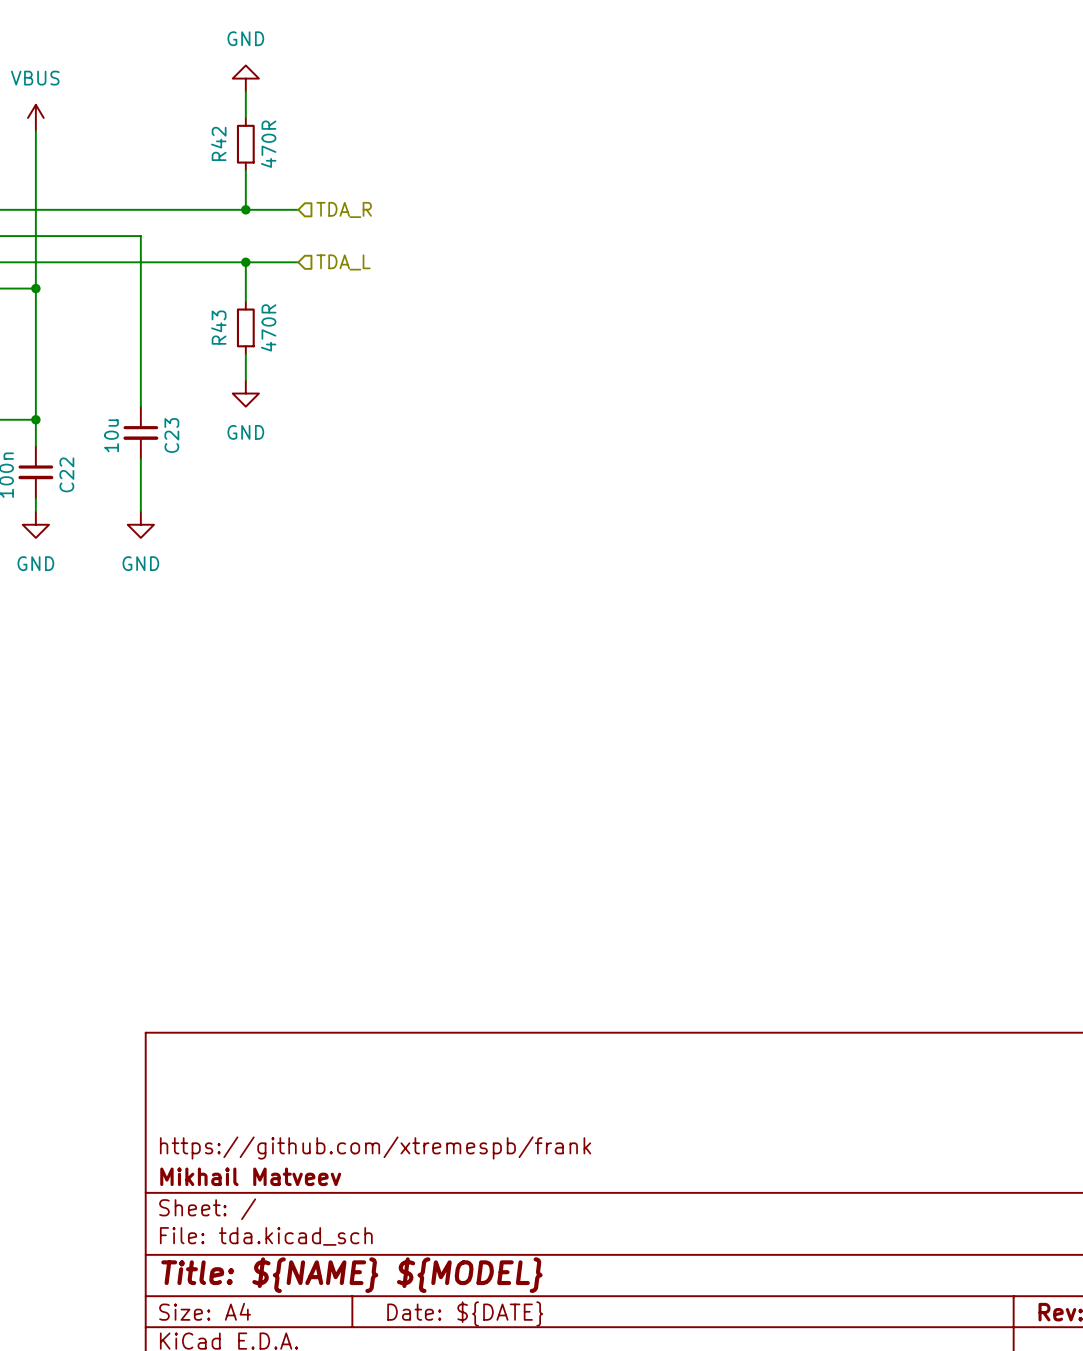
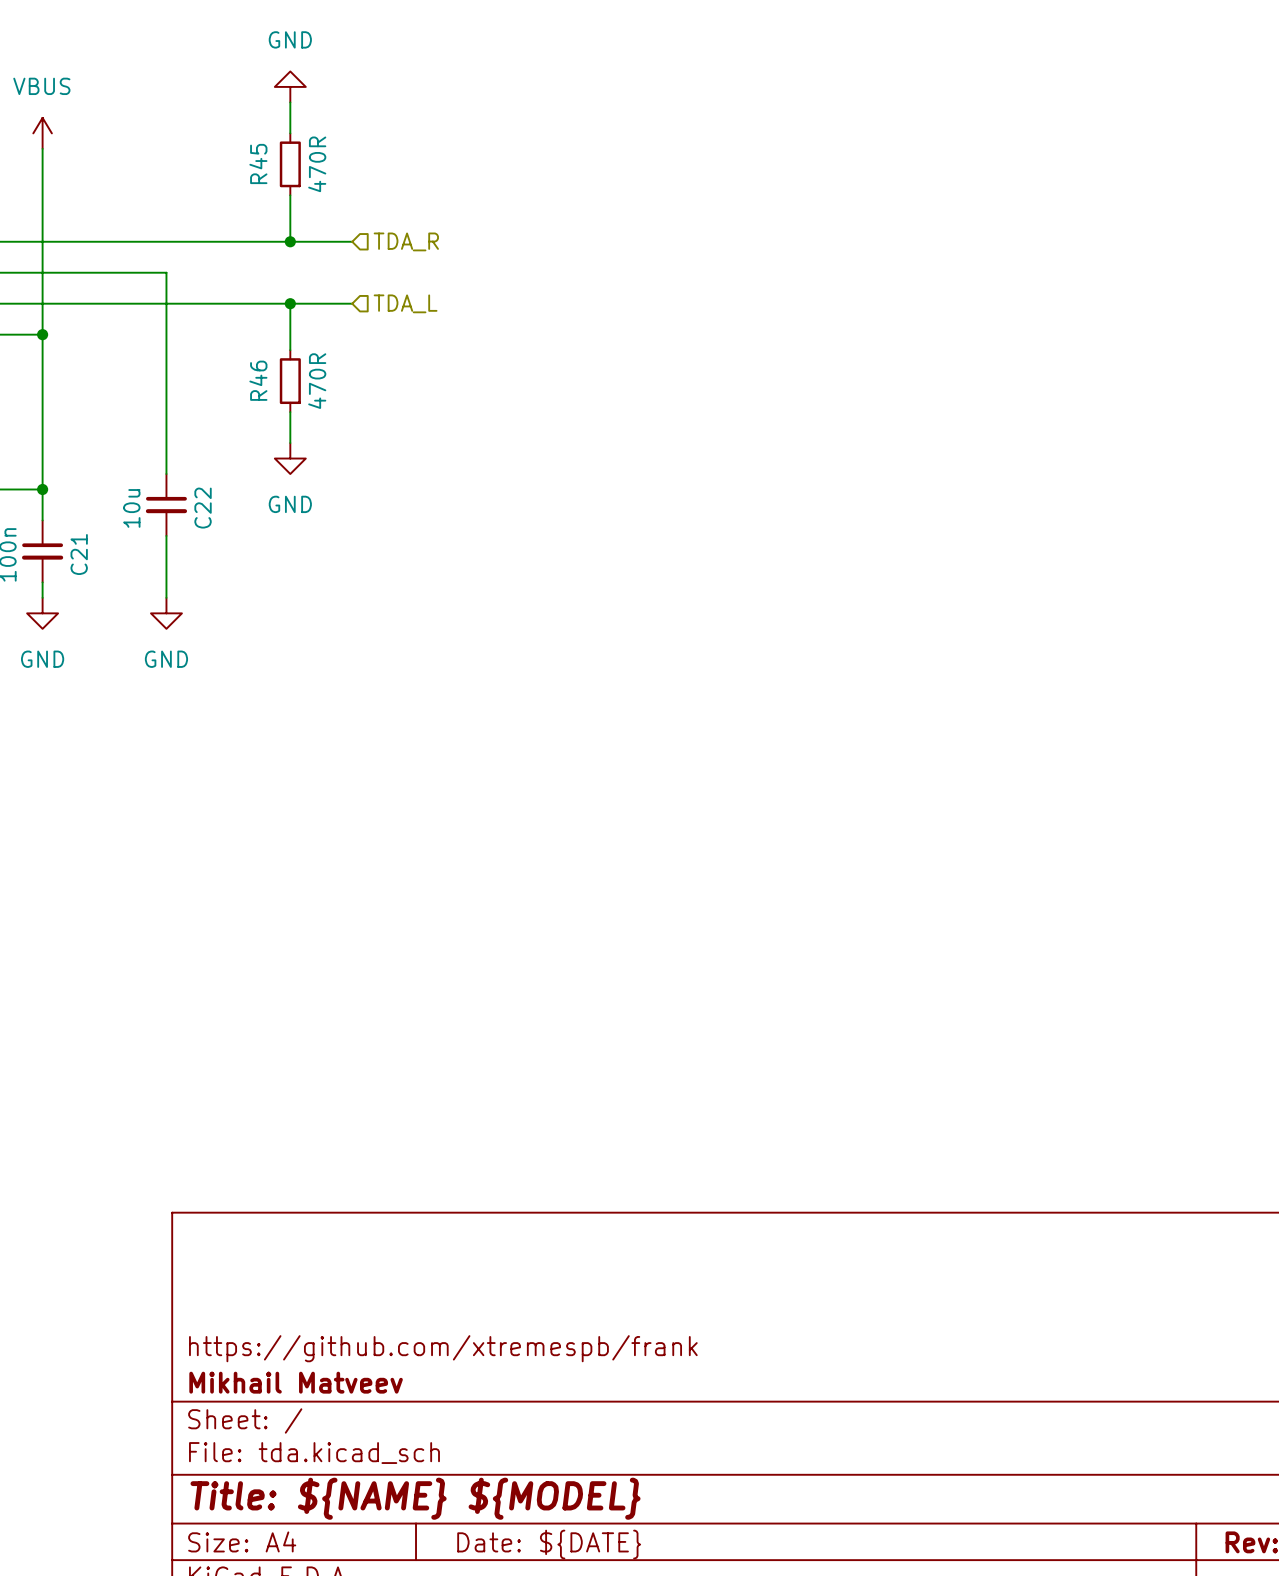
R42 name: R42 (218, 143) -> R45 (258, 163)
R43 name: R43 (218, 327) -> R46 (258, 380)
C23 name: C23 (171, 435) -> C22 (203, 508)
C22 name: C22 (66, 474) -> C21 (79, 554)

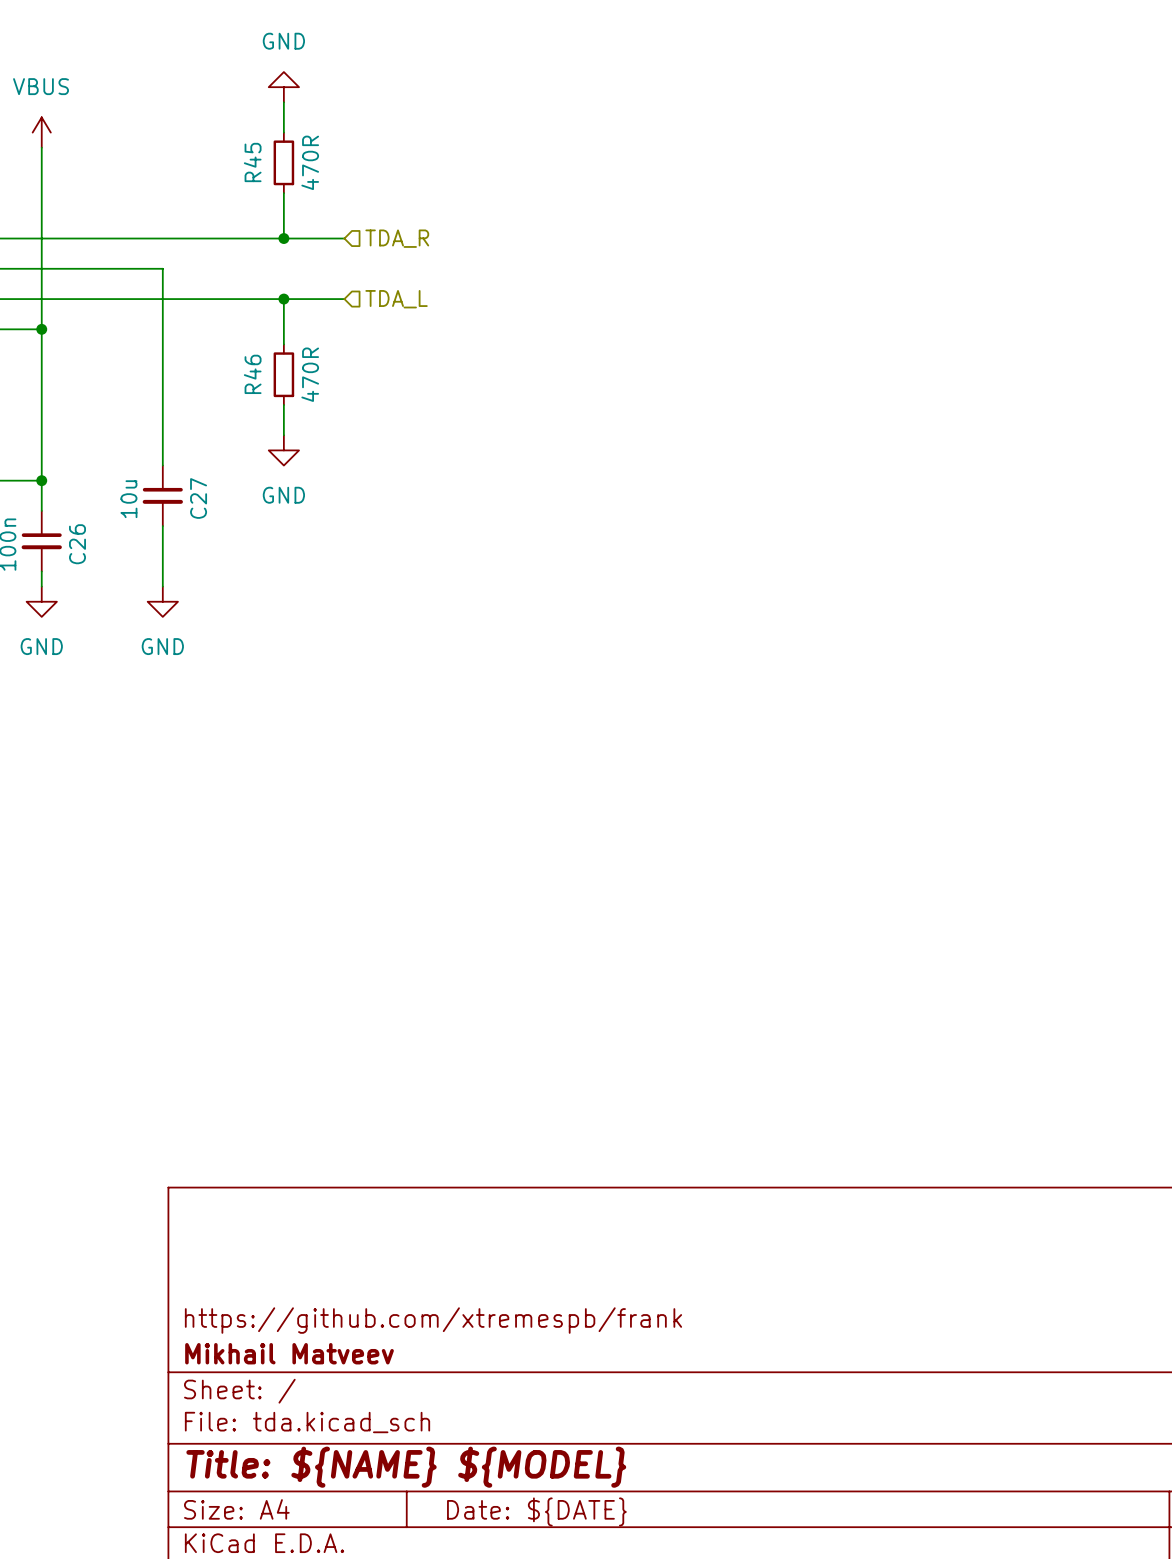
C22 name: C22 (203, 508) -> C27 (198, 498)
C21 name: C21 (79, 554) -> C26 (77, 544)

